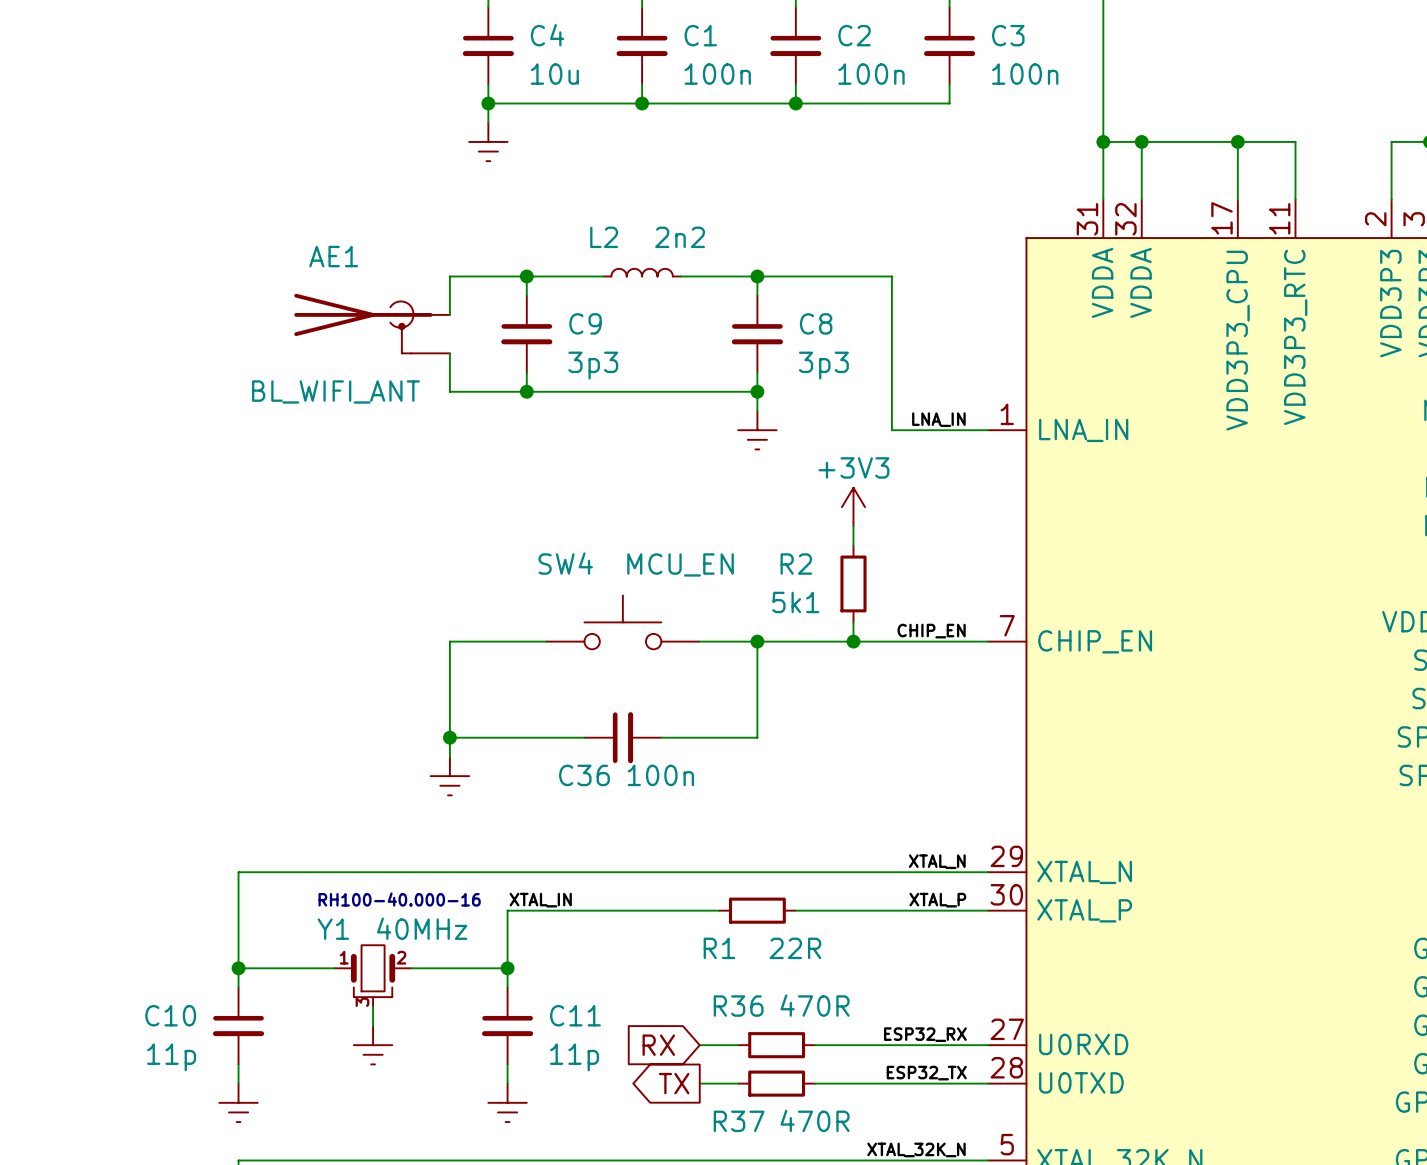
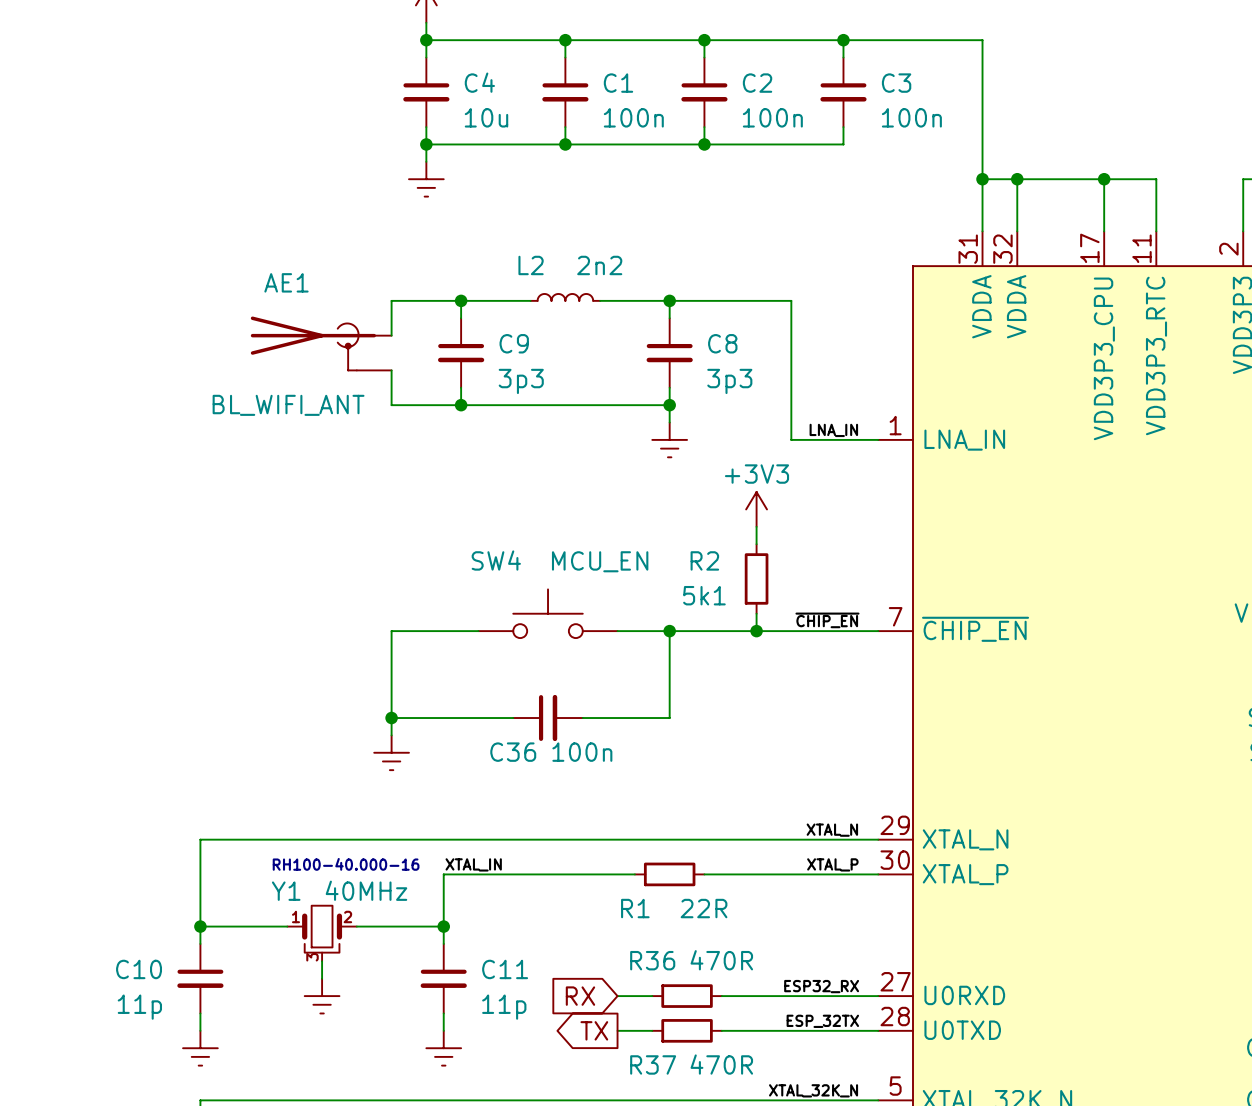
label: CHIP_EN (931, 631) -> ~{CHIP_EN} (827, 620)
part pin name: CHIP_EN (1095, 641) -> ~{CHIP_EN} (975, 629)
label: ESP32_TX (926, 1073) -> ESP_32TX (822, 1021)

